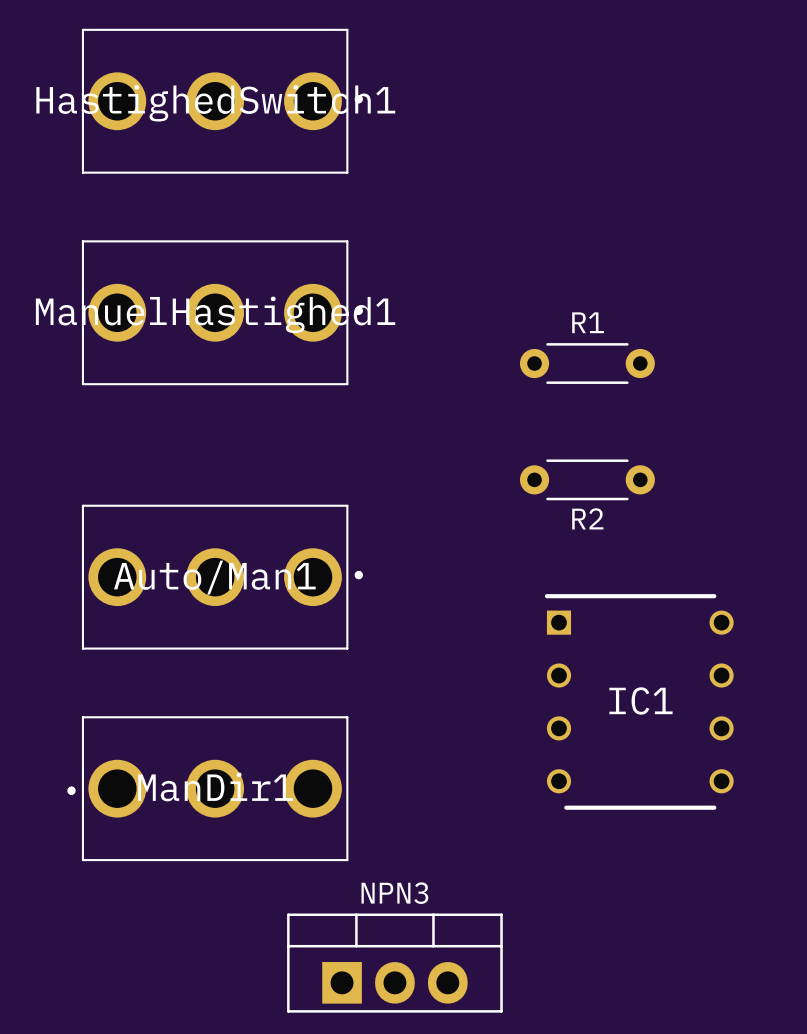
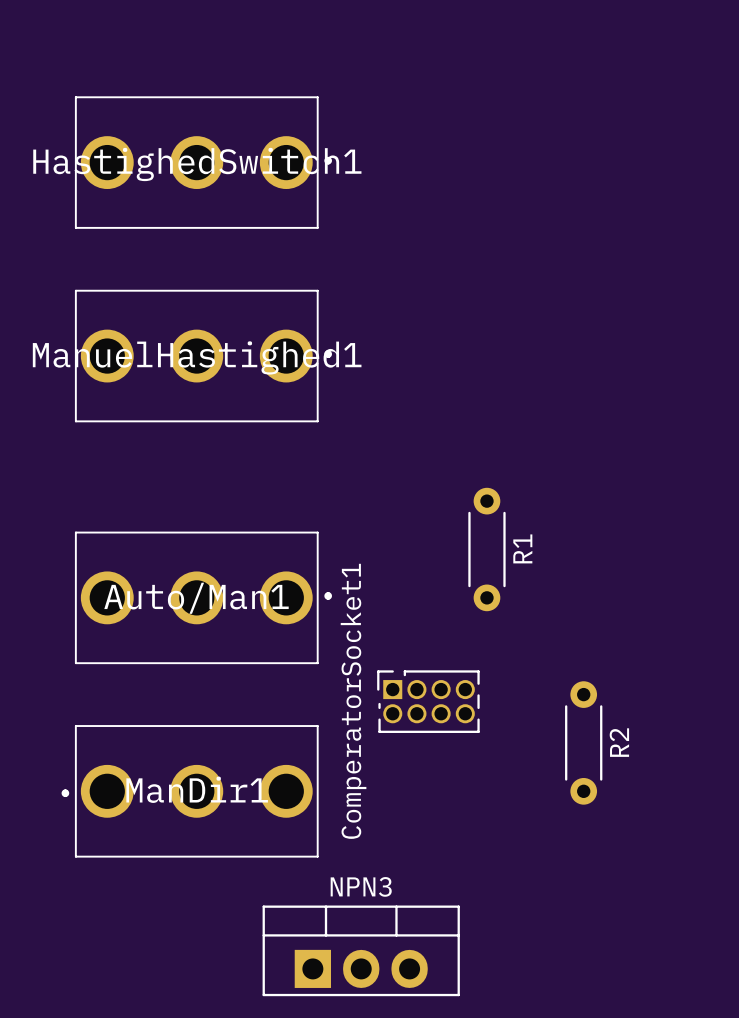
R1 rotation: 0° (587, 363) -> 90° clockwise (486, 549)
R1 position: (587, 363) -> (486, 549)
R2 rotation: 0° (587, 479) -> 90° clockwise (583, 742)
R2 position: (587, 479) -> (583, 742)
R2 name position: R2 (587, 518) -> R2 (619, 742)
ComperatorSocket1: none -> (428, 701)
IC1: (639, 701) -> none

